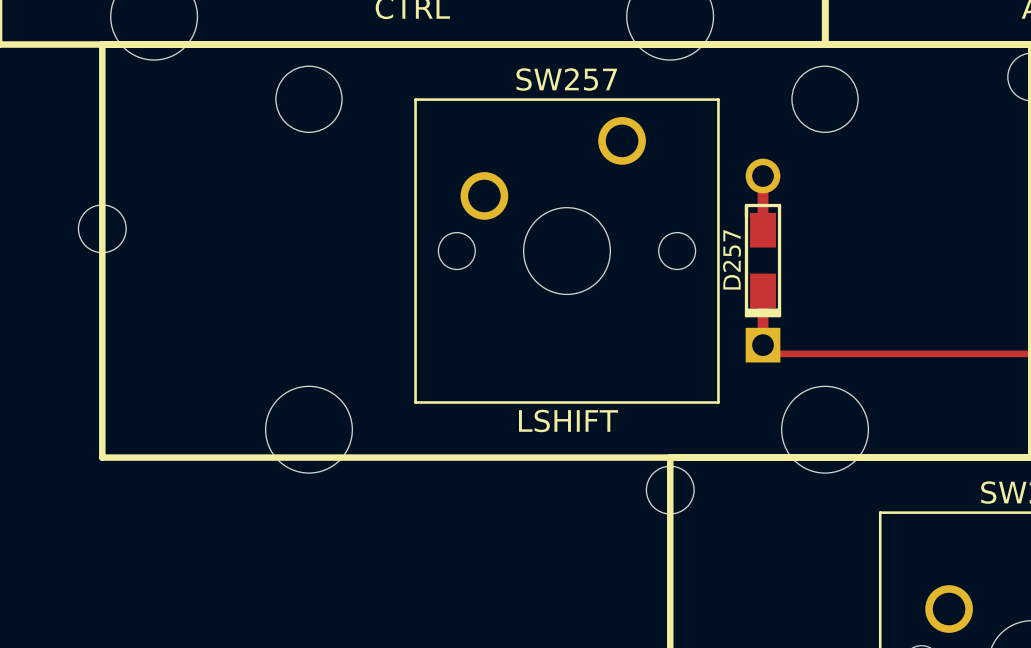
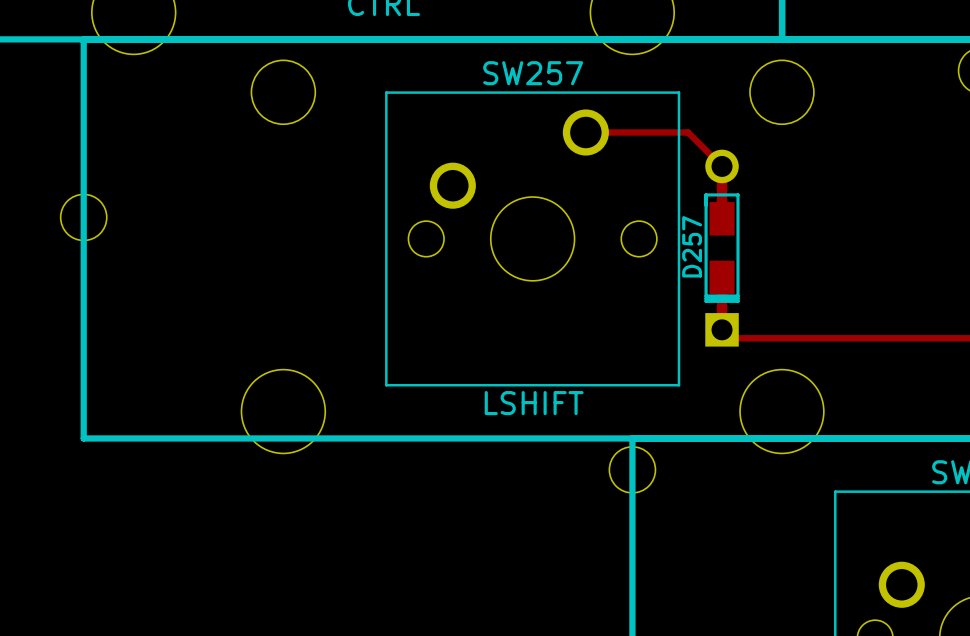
track: none -> (585, 132) (688, 132) (722, 166)

